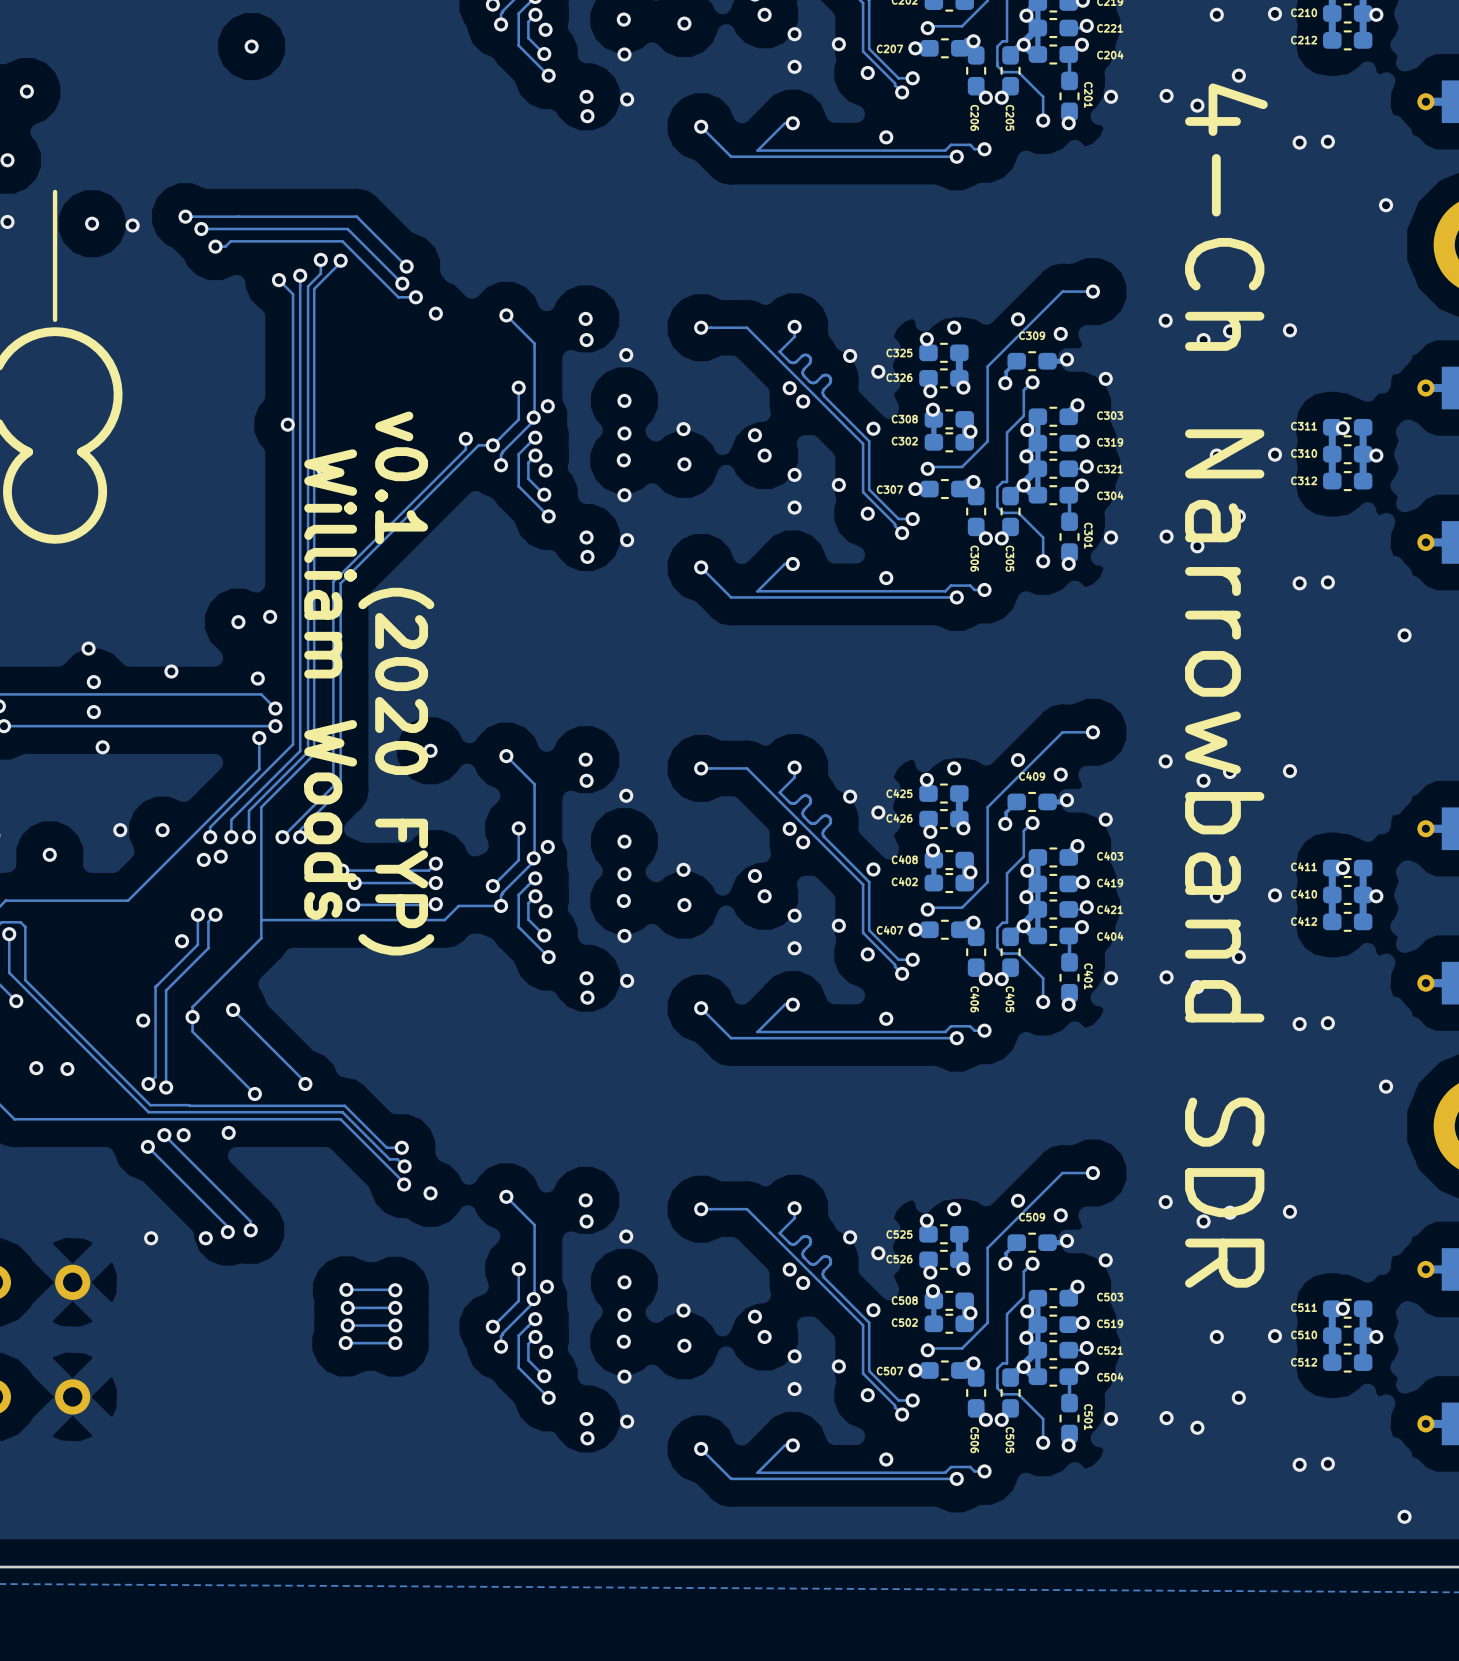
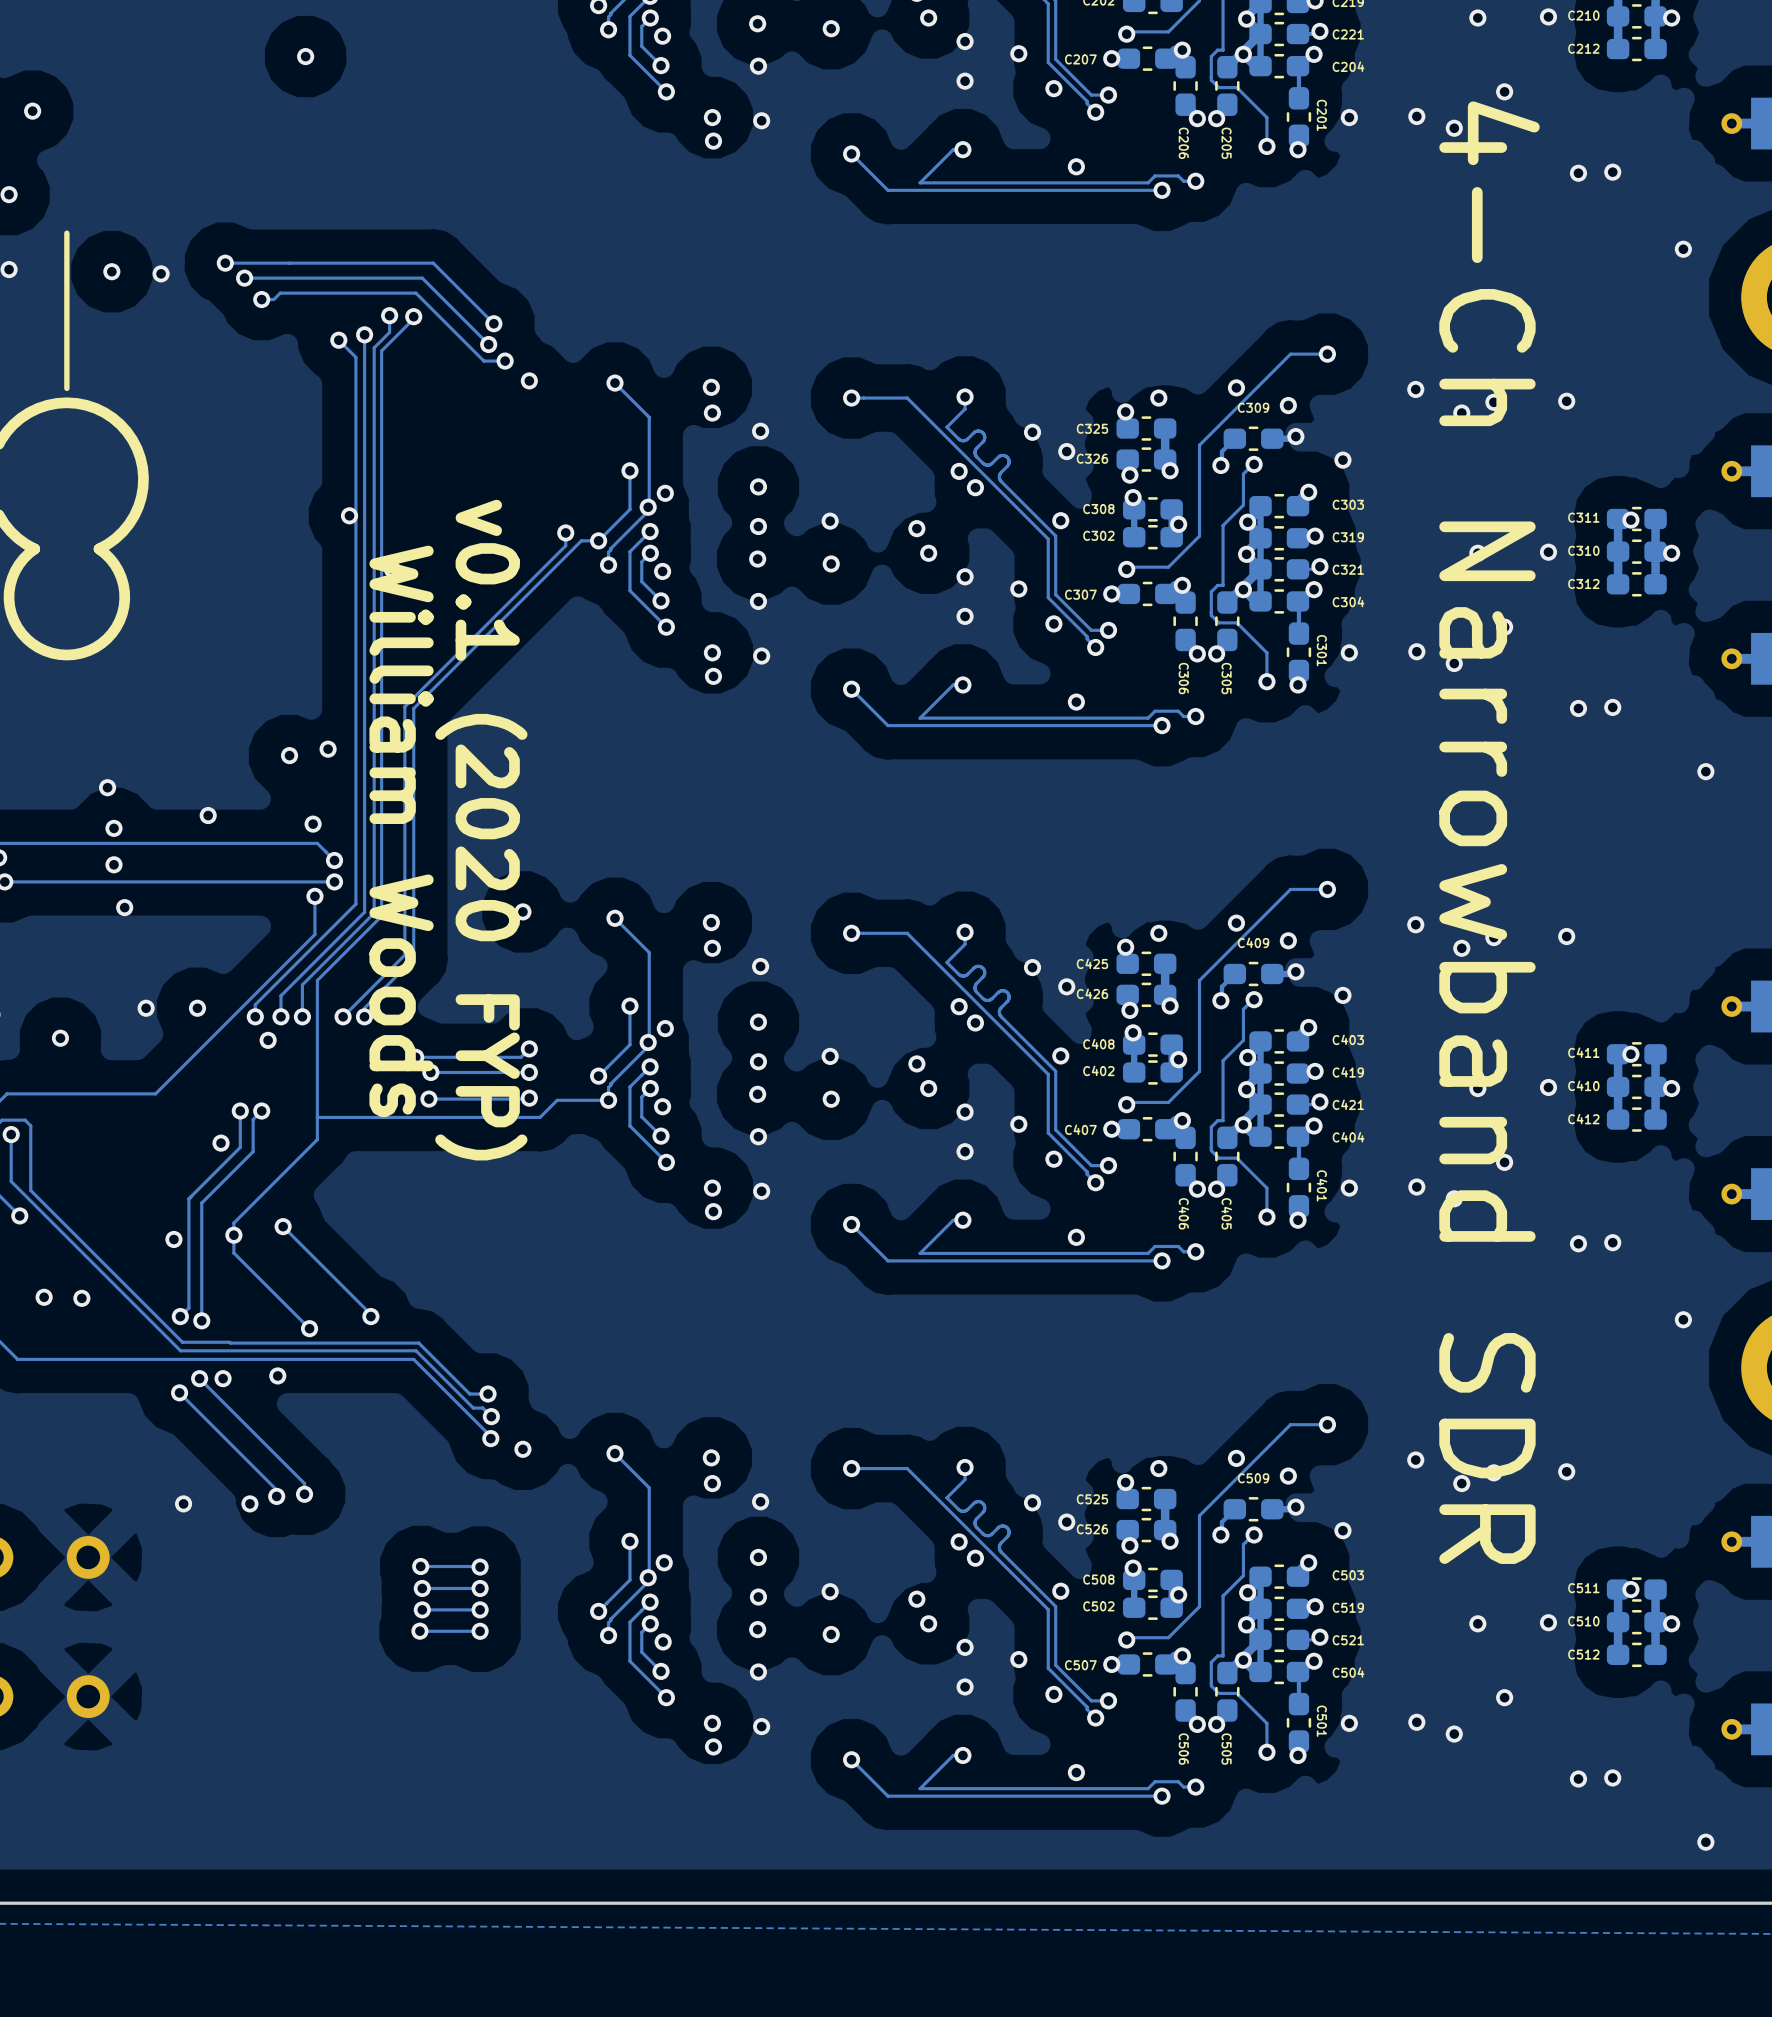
via: (203, 859) -> none

